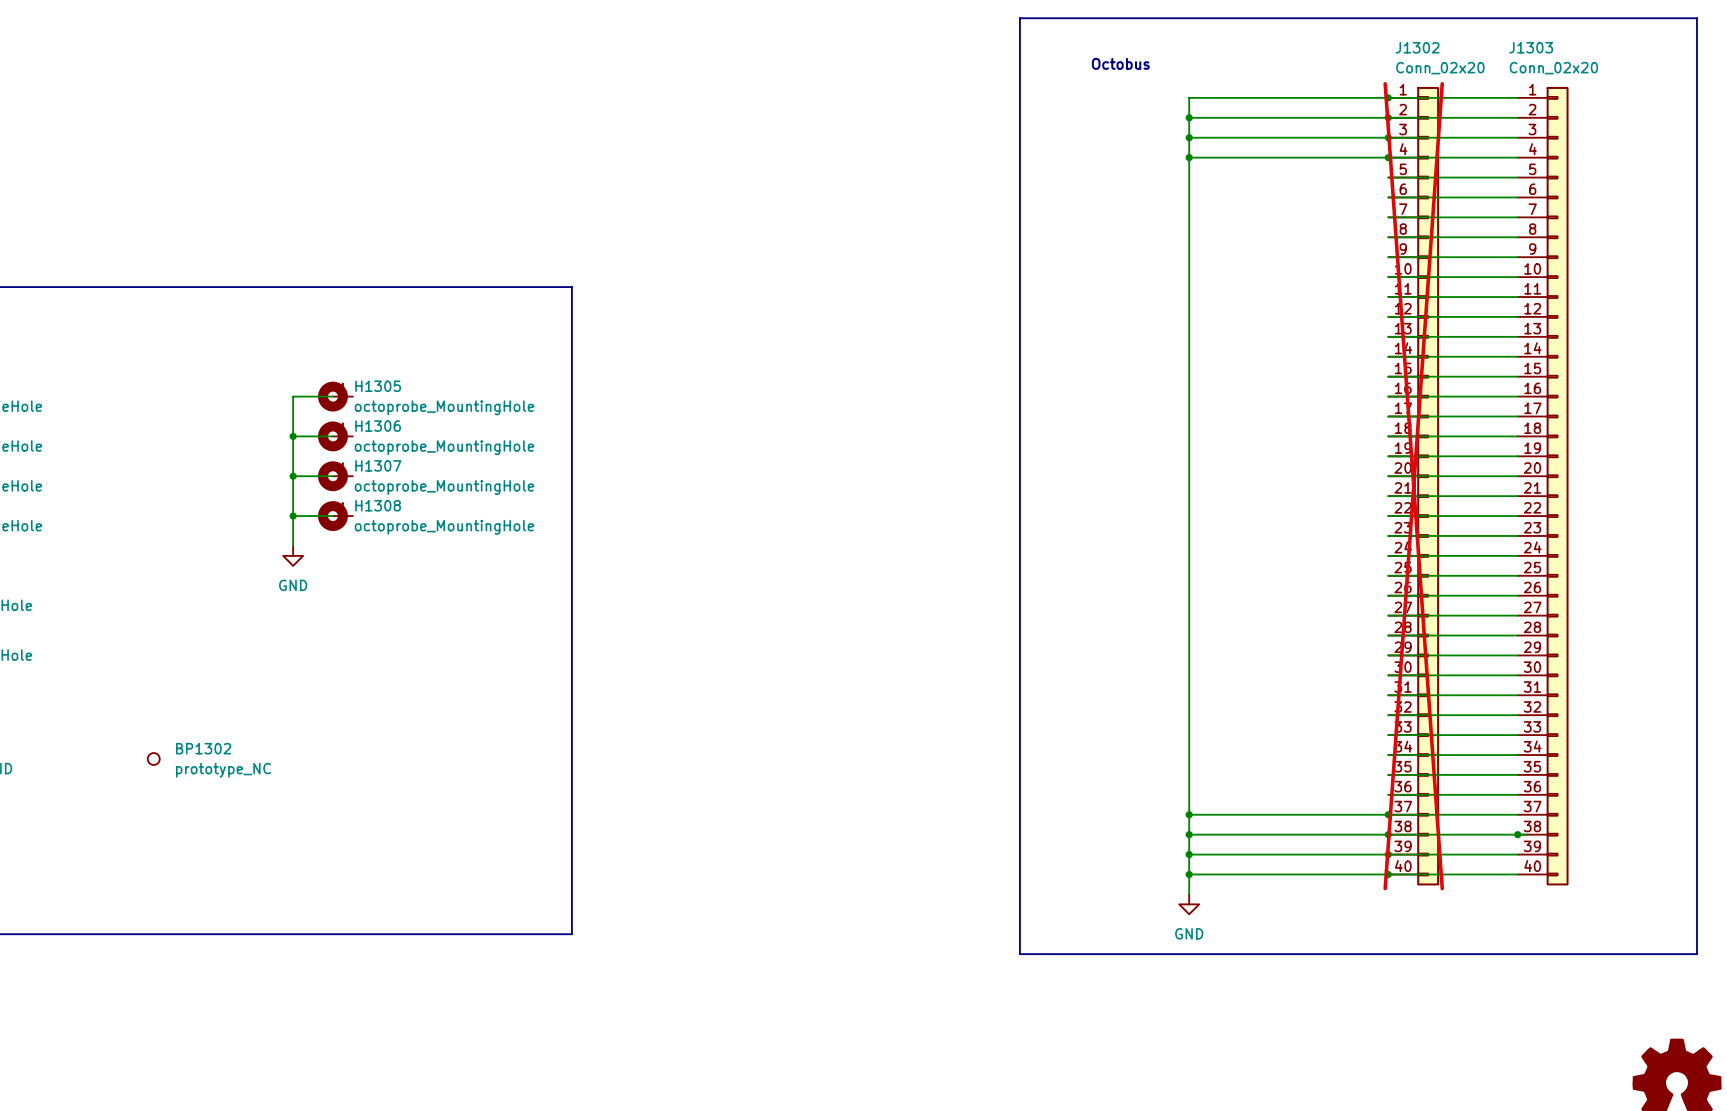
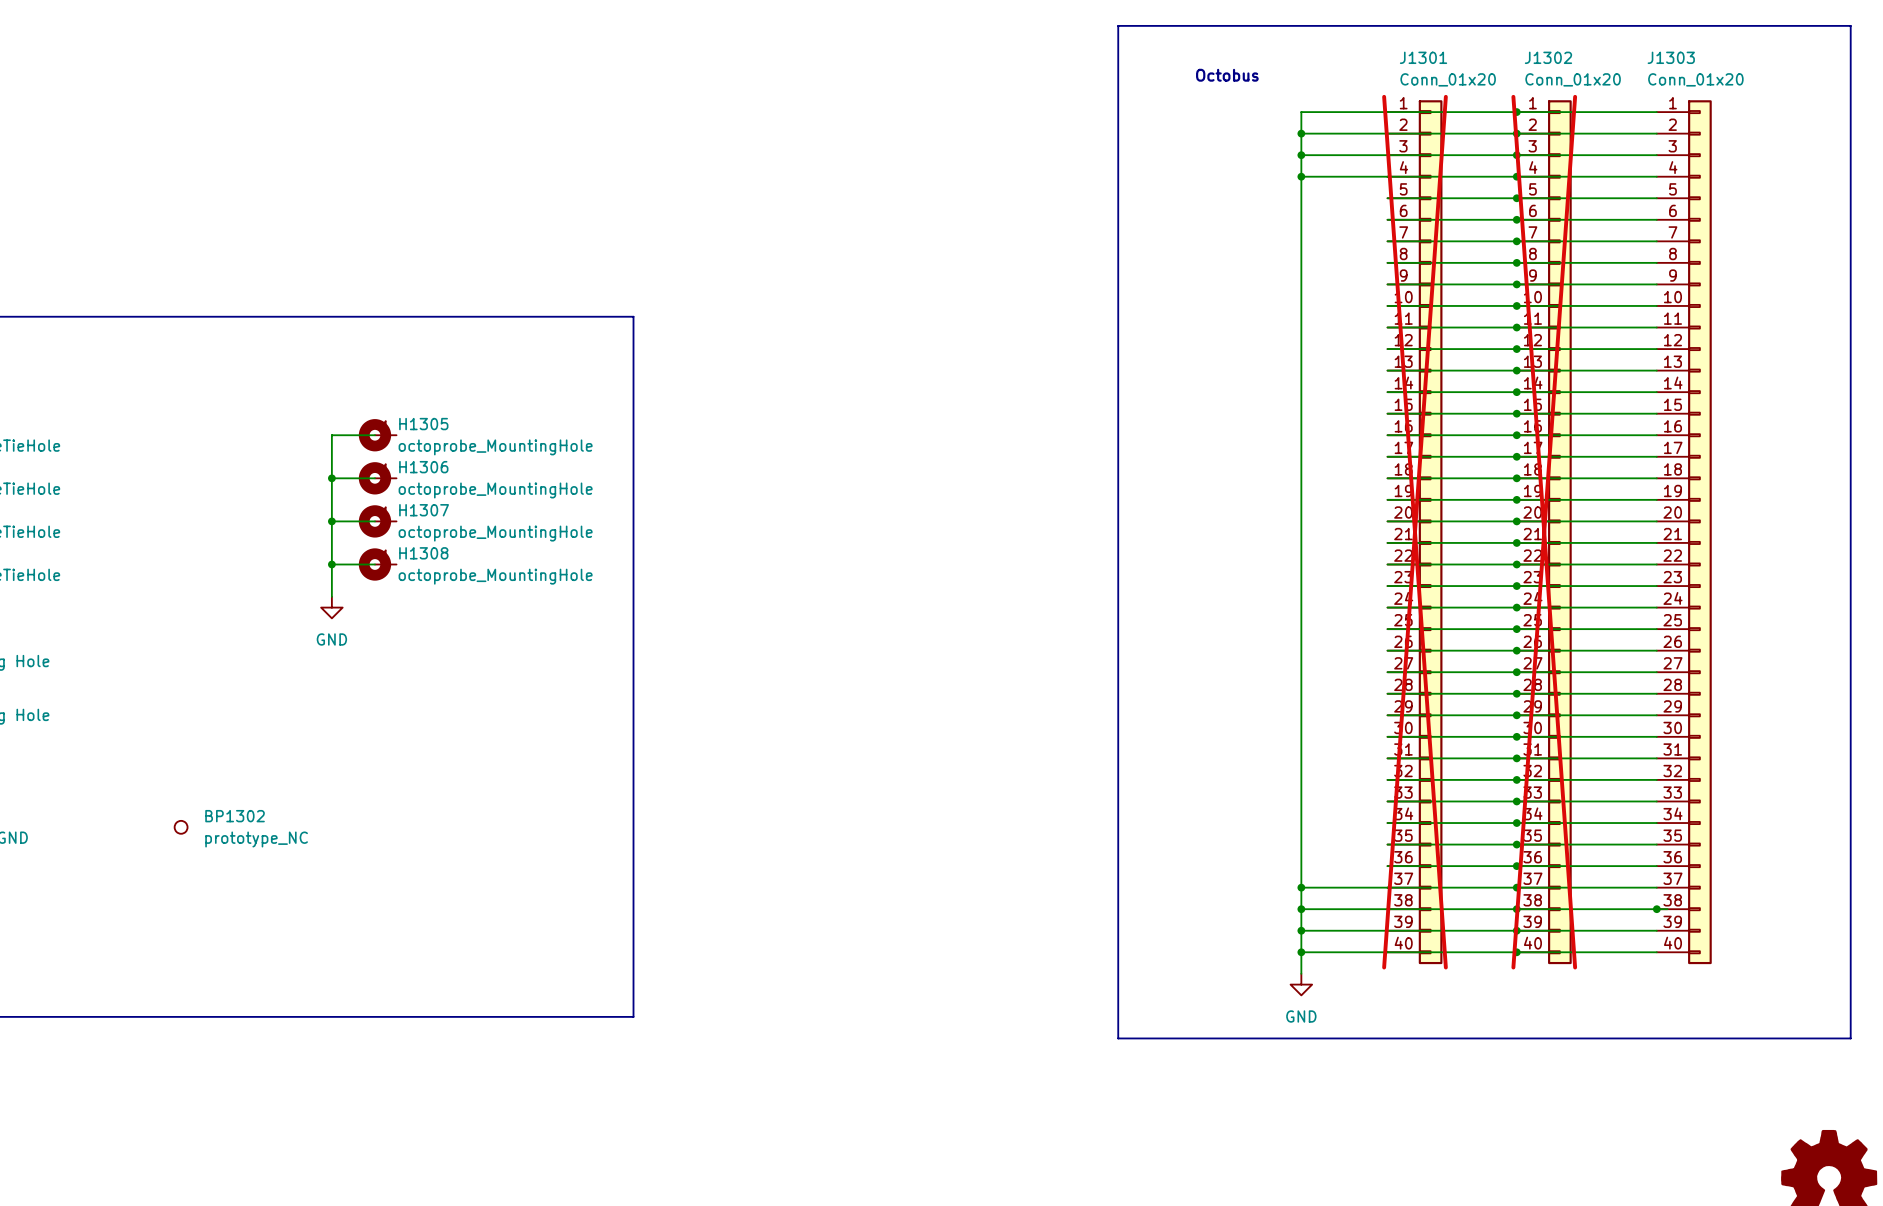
J1302 value: Conn_02x20 (1440, 68) -> Conn_01x20 (1573, 79)
J1303 value: Conn_02x20 (1553, 68) -> Conn_01x20 (1695, 79)
wire: none -> (1387, 198) (1516, 198)
junction: none -> (1516, 198)
wire: none -> (1387, 219) (1516, 219)
junction: none -> (1516, 219)
wire: none -> (1387, 241) (1516, 241)
junction: none -> (1516, 241)
wire: none -> (1387, 262) (1516, 262)
junction: none -> (1516, 262)
wire: none -> (1387, 284) (1516, 284)
junction: none -> (1516, 284)
wire: none -> (1387, 305) (1516, 305)
junction: none -> (1516, 305)
wire: none -> (1387, 327) (1516, 327)
junction: none -> (1516, 327)
wire: none -> (1387, 349) (1516, 349)
junction: none -> (1516, 349)
wire: none -> (1387, 370) (1516, 370)
junction: none -> (1516, 370)
wire: none -> (1387, 392) (1516, 392)
junction: none -> (1516, 392)
wire: none -> (1387, 413) (1516, 413)
junction: none -> (1516, 413)
wire: none -> (1387, 435) (1516, 435)
junction: none -> (1516, 435)
wire: none -> (1387, 456) (1516, 456)
junction: none -> (1516, 456)
wire: none -> (1387, 478) (1516, 478)
junction: none -> (1516, 478)
wire: none -> (1387, 499) (1516, 499)
junction: none -> (1516, 499)
wire: none -> (1387, 521) (1516, 521)
junction: none -> (1516, 521)
J1301: none -> Conn_01x20 (1414, 532)
wire: none -> (1387, 542) (1516, 542)
junction: none -> (1516, 542)
wire: none -> (1387, 564) (1516, 564)
junction: none -> (1516, 564)
wire: none -> (1387, 586) (1516, 586)
junction: none -> (1516, 586)
wire: none -> (1387, 607) (1516, 607)
junction: none -> (1516, 607)
wire: none -> (1387, 629) (1516, 629)
junction: none -> (1516, 629)
wire: none -> (1387, 650) (1516, 650)
junction: none -> (1516, 650)
wire: none -> (1387, 672) (1516, 672)
junction: none -> (1516, 672)
wire: none -> (1387, 693) (1516, 693)
junction: none -> (1516, 693)
wire: none -> (1387, 715) (1516, 715)
junction: none -> (1516, 715)
wire: none -> (1387, 736) (1516, 736)
junction: none -> (1516, 736)
wire: none -> (1387, 758) (1516, 758)
junction: none -> (1516, 758)
wire: none -> (1387, 779) (1516, 779)
junction: none -> (1516, 779)
wire: none -> (1387, 801) (1516, 801)
junction: none -> (1516, 801)
wire: none -> (1387, 823) (1516, 823)
junction: none -> (1516, 823)
wire: none -> (1387, 844) (1516, 844)
junction: none -> (1516, 844)
wire: none -> (1387, 866) (1516, 866)
junction: none -> (1516, 866)

